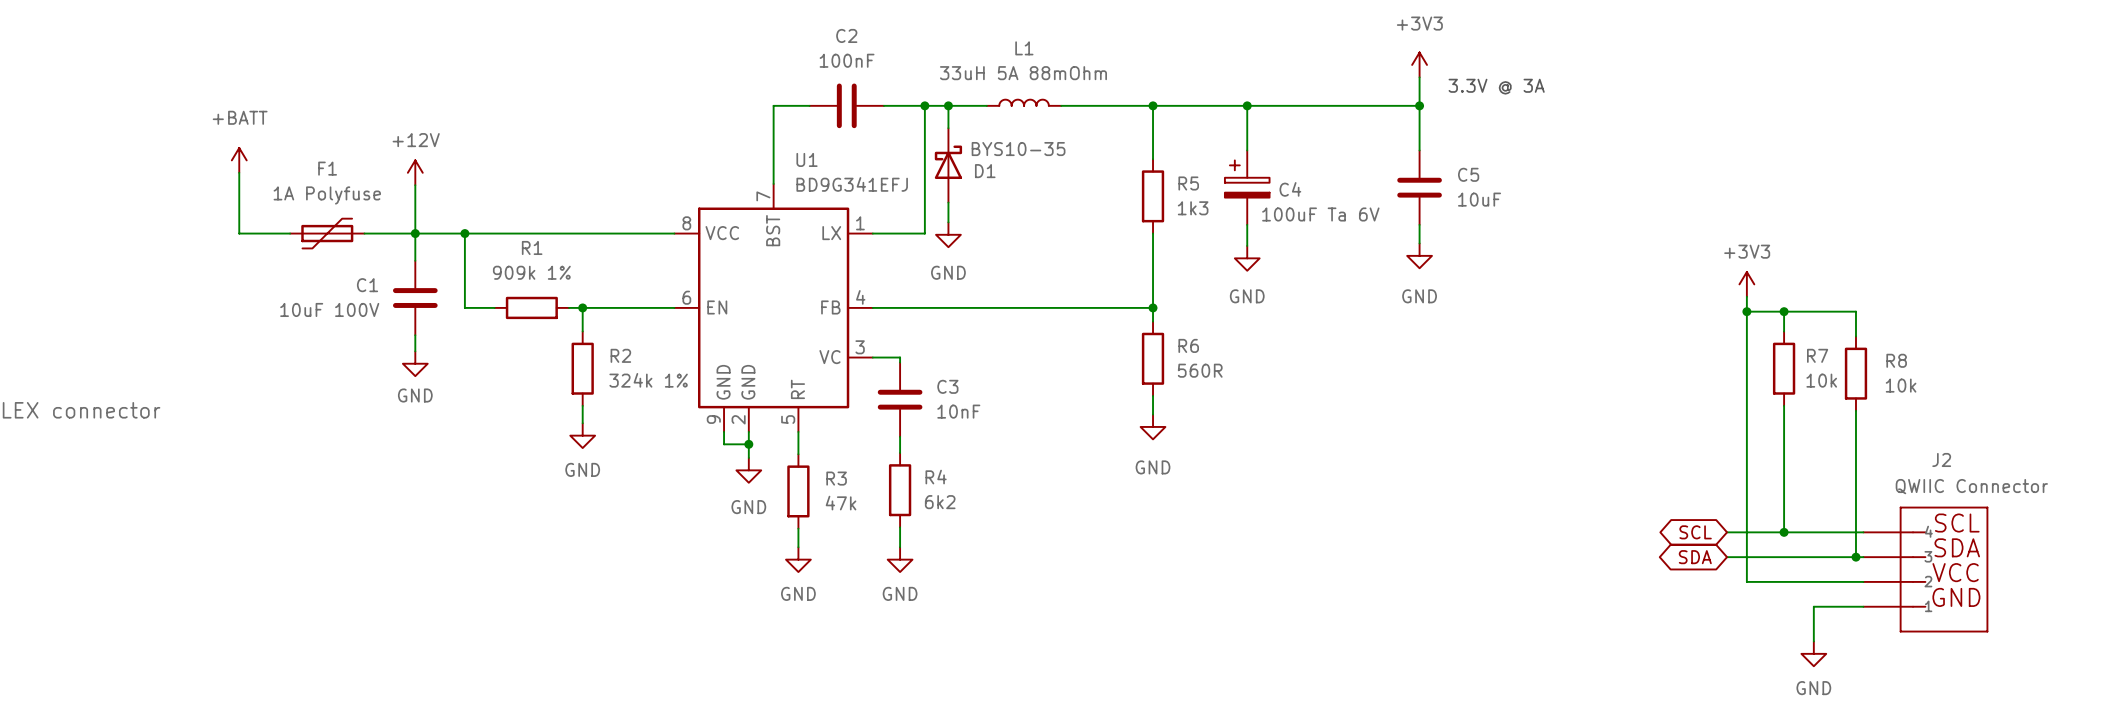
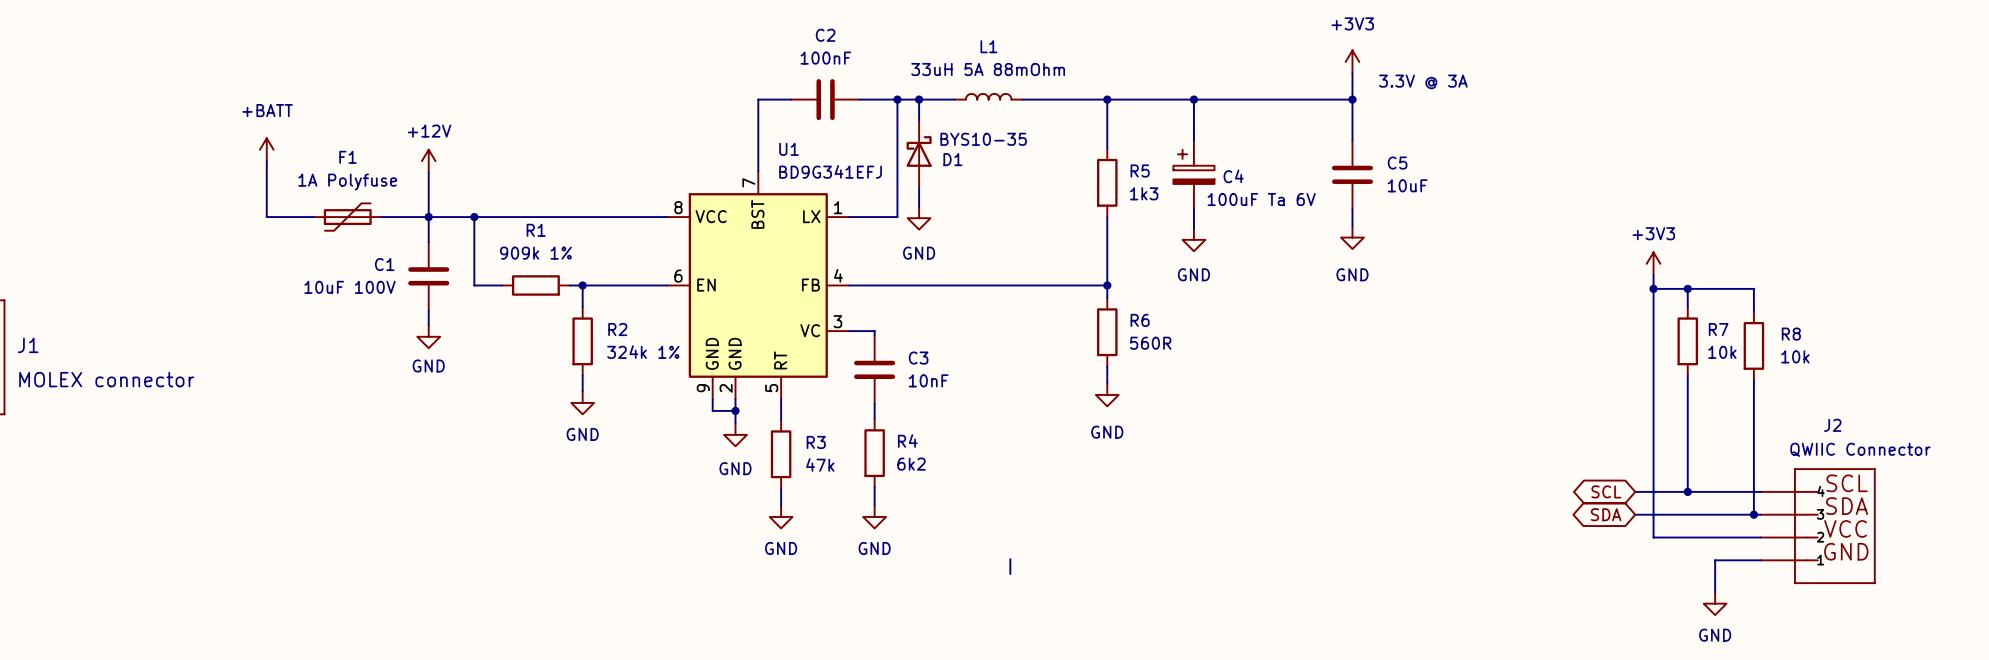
wire: none -> (1010, 559) (1010, 574)

